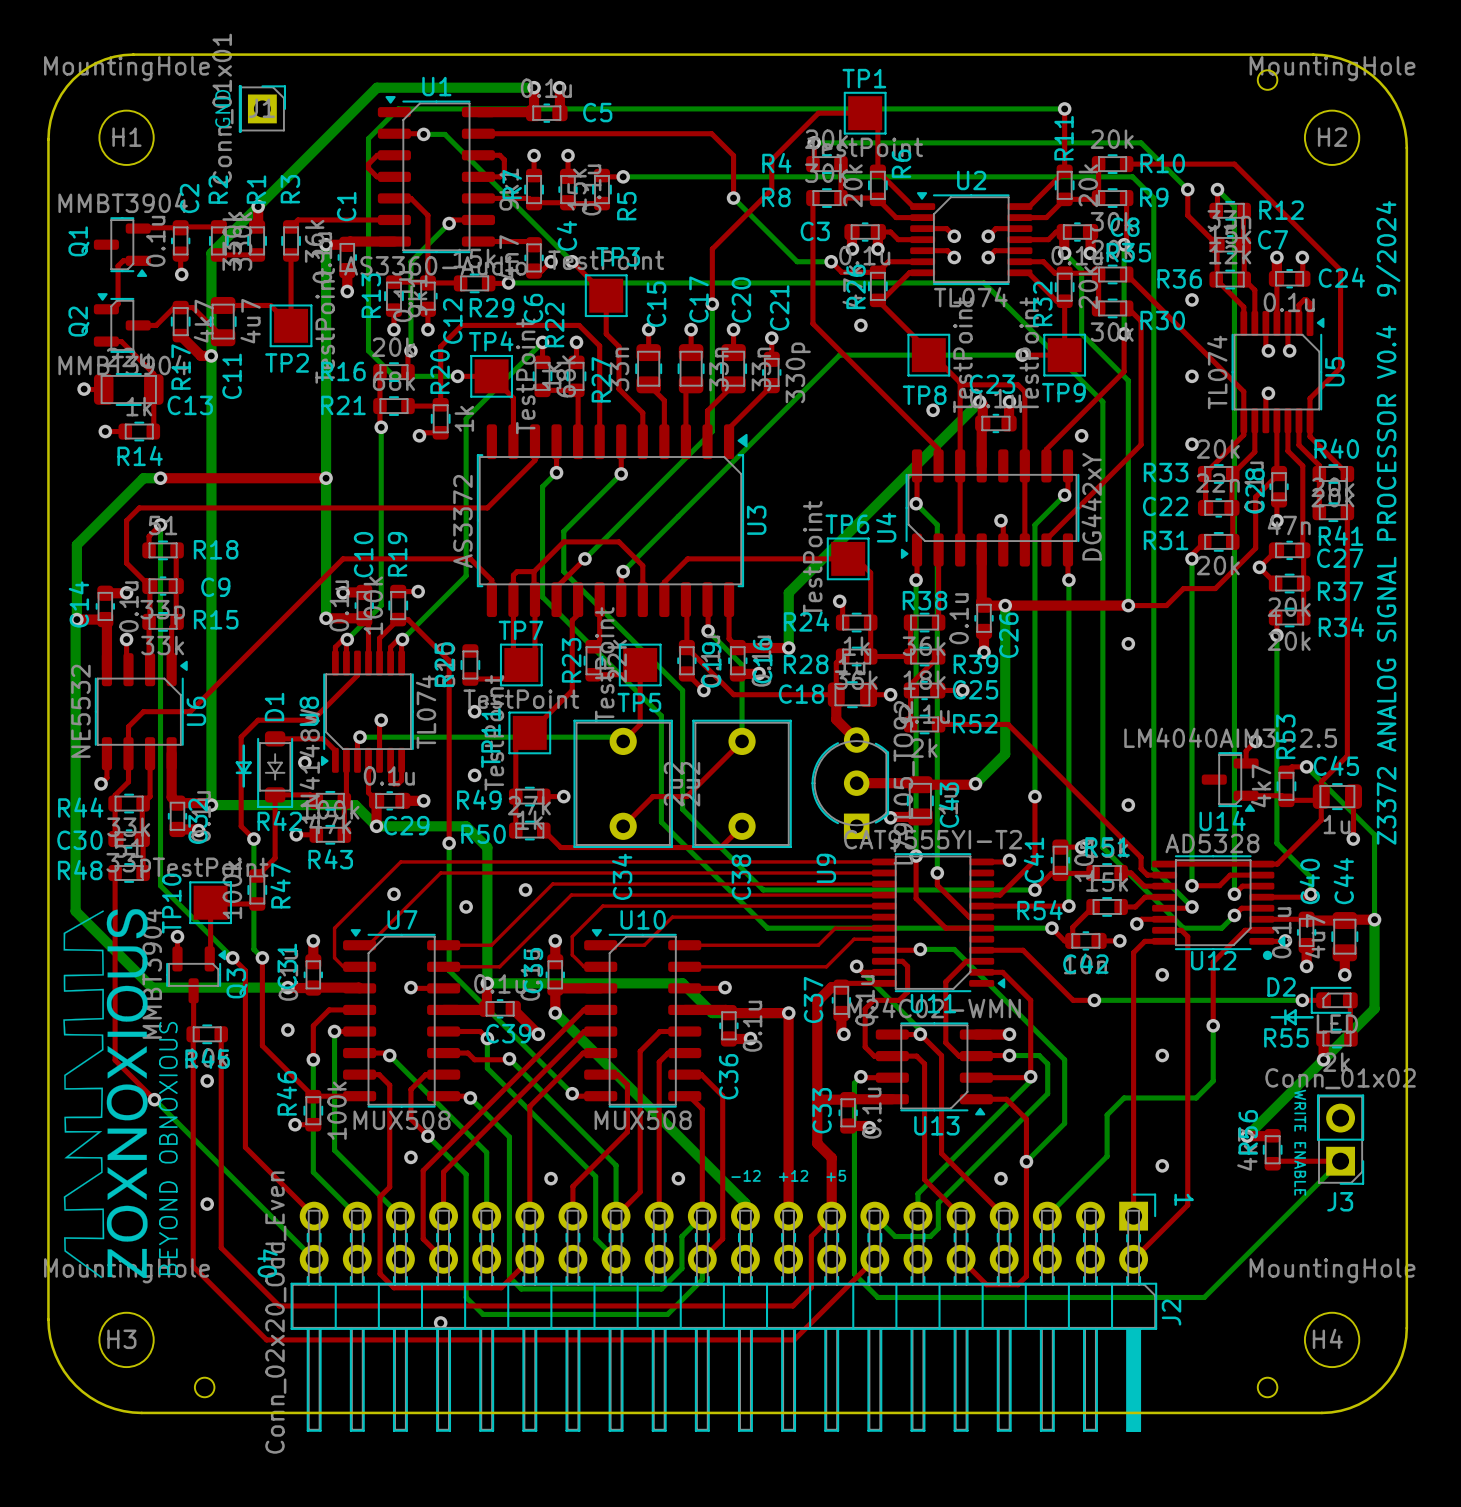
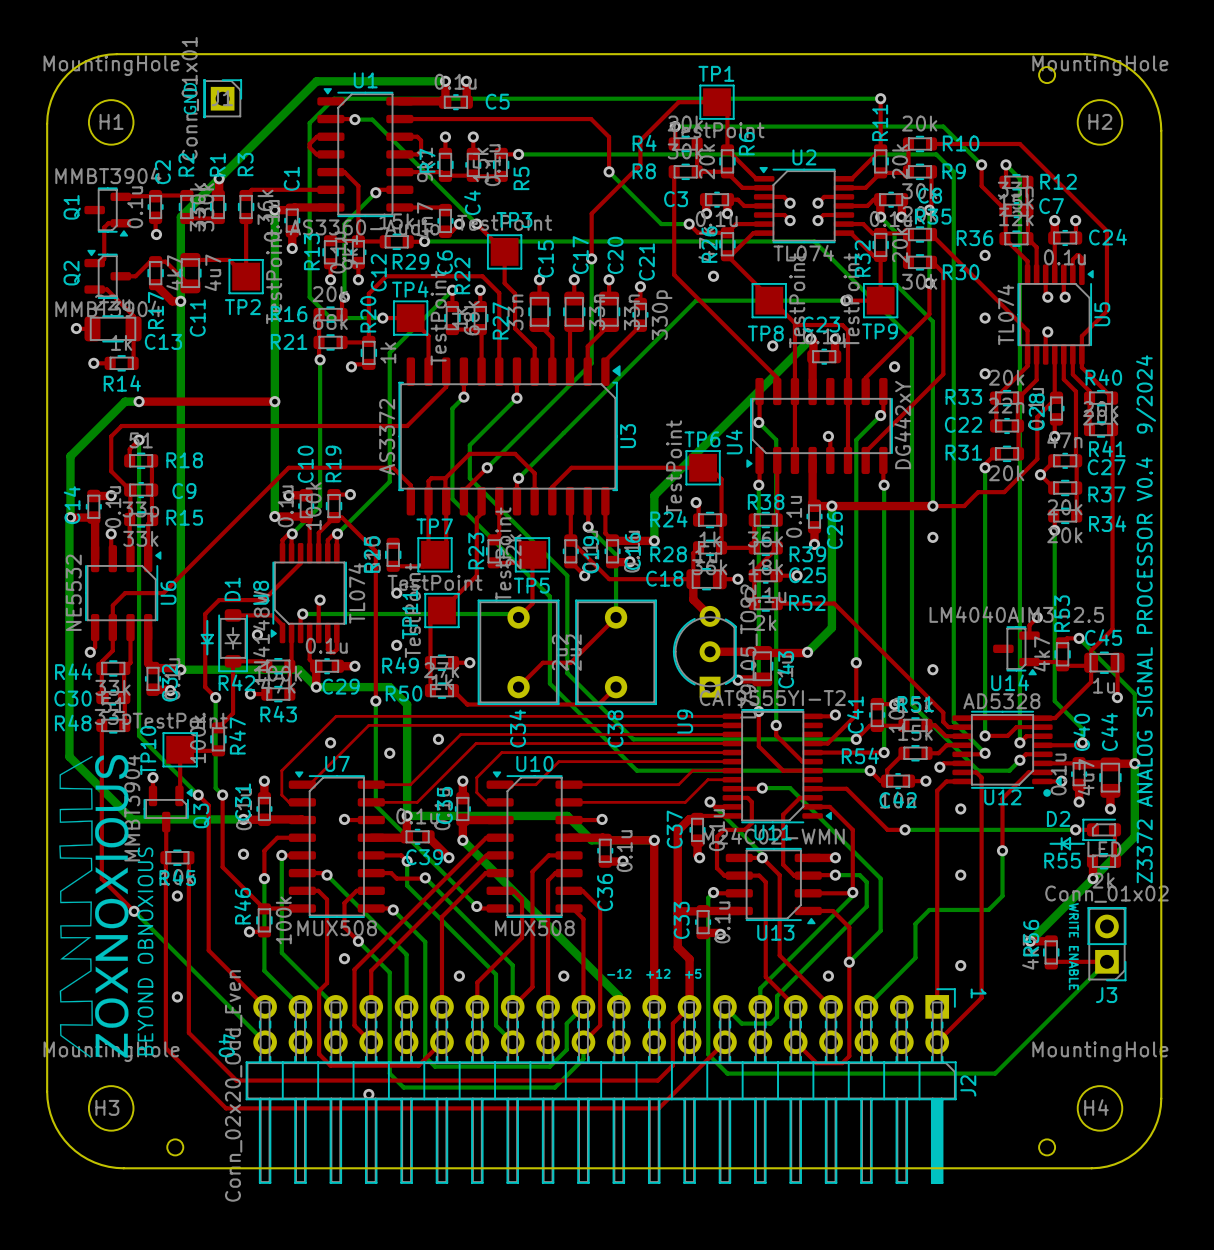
text position: Z3372 ANALOG SIGNAL PROCESSOR V0.4 9/2024 (1388, 522) -> Z3372 ANALOG SIGNAL PROCESSOR V0.4 9/2024 (1146, 619)

